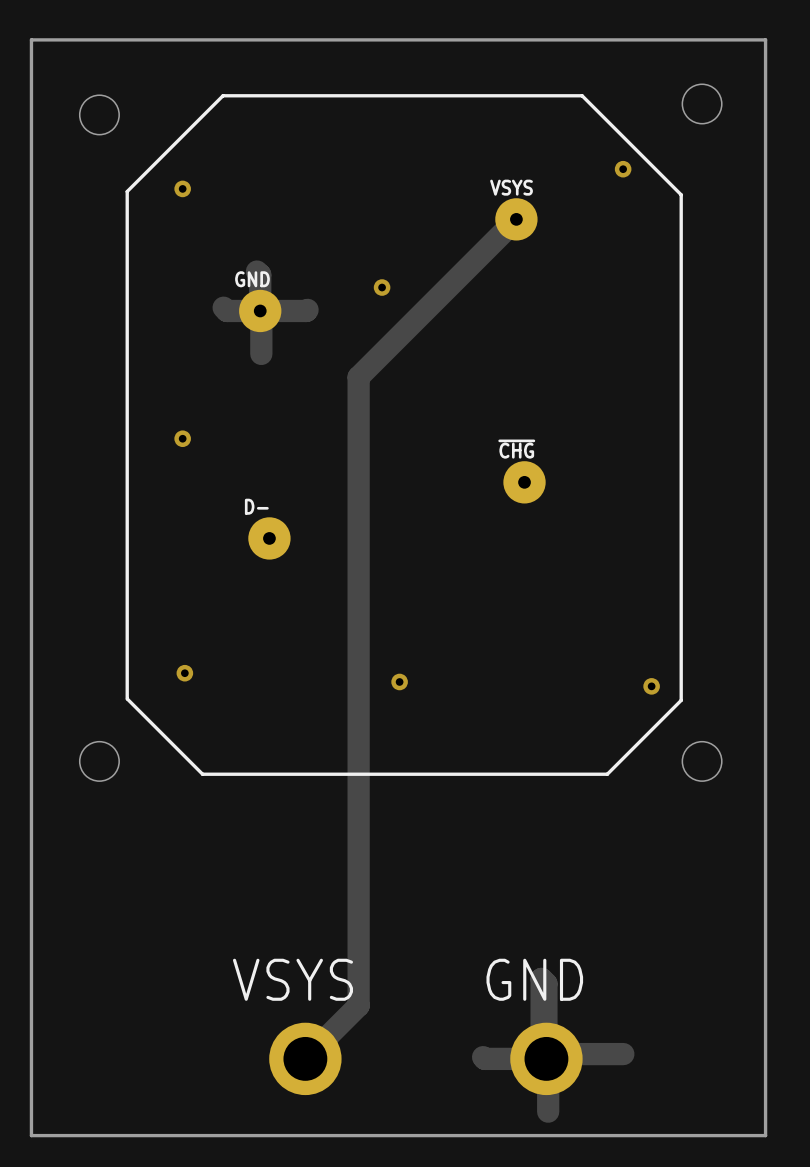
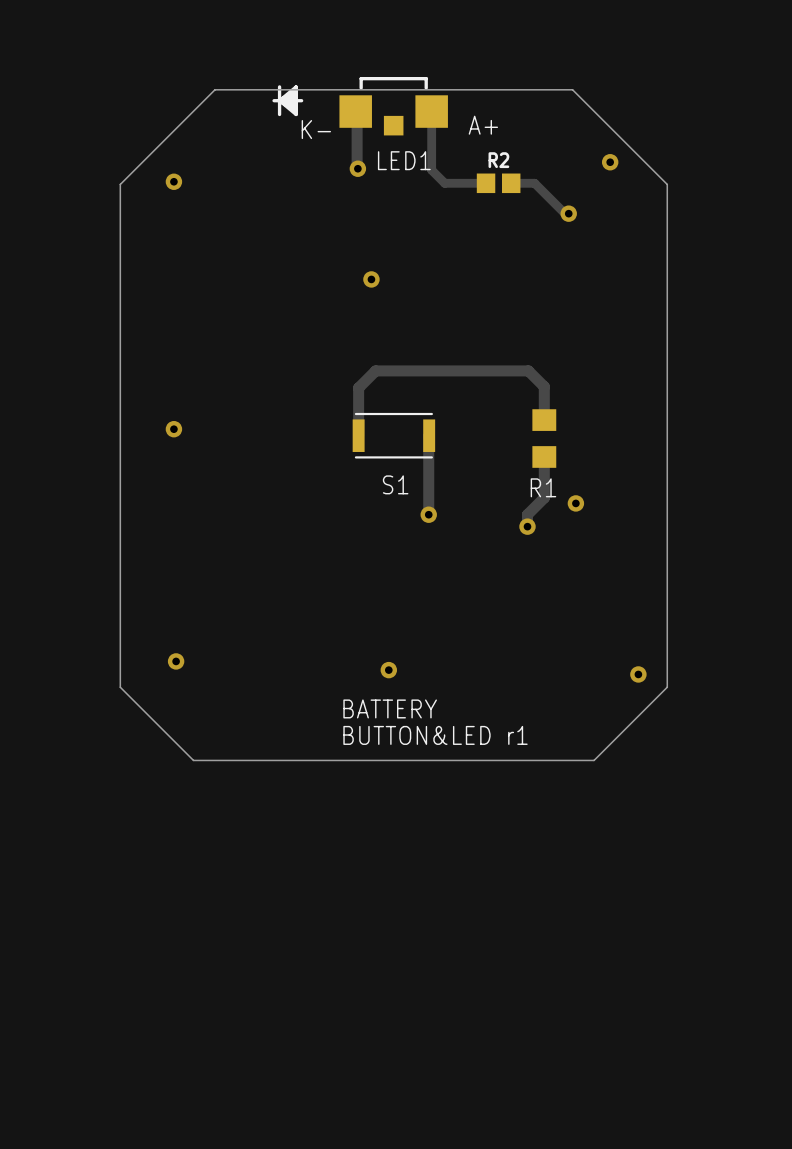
board edge: (31, 39) (765, 39) (765, 1135) (31, 1135) (31, 39) -> none
round board edge: [682, 84, 722, 124] -> none
round board edge: [79, 95, 120, 135] -> none
board edge: none -> (214, 89) (572, 89) (667, 184) (667, 687) (594, 760) (193, 760) (120, 687) (120, 184) (214, 89)
LED1: none -> (360, 106)
track: none -> (355, 111) (357, 168)
track: none -> (431, 111) (431, 170) (444, 183) (486, 183)
text: none -> A+ (483, 125)
text: none -> K- (316, 129)
via: none -> (357, 168)
R2: none -> (498, 183)
track: none -> (511, 183) (534, 183) (565, 213) (568, 213)
track: (516, 219) (358, 377) (358, 1005) (305, 1058) -> none
VSYS: (516, 219) -> none
via: none -> (568, 213)
track: (256, 271) (260, 274) (261, 353) -> none
track: (223, 307) (226, 310) (307, 309) -> none
GND: (260, 310) -> none
track: none -> (544, 420) (544, 386) (528, 370) (375, 370) (358, 387) (358, 435)
S1: none -> (393, 435)
track: none -> (429, 435) (428, 514)
R1: none -> (544, 438)
track: none -> (544, 456) (544, 497) (527, 514) (527, 526)
~{CHG}: (524, 482) -> none
via: none -> (575, 503)
via: none -> (428, 514)
via: none -> (527, 526)
D-: (269, 538) -> none
line: (127, 698) (127, 191) (222, 95) (582, 95) (681, 194) (681, 700) (607, 774) (202, 774) (127, 699) -> none
text: none -> BATTERY (390, 708)
round board edge: [79, 741, 120, 782] -> none
round board edge: [682, 741, 722, 782] -> none
text: none -> BUTTON&LED r1 (435, 735)
text: VSYS (292, 979) -> none
text: GND (534, 979) -> none
track: (623, 1054) (551, 1054) (546, 1058) -> none
track: (483, 1057) (484, 1058) (546, 1058) -> none
part: (305, 1058) -> none
track: (546, 1058) (546, 983) (541, 978) (541, 1054) (548, 1060) (548, 1111) -> none
part: (546, 1058) -> none

